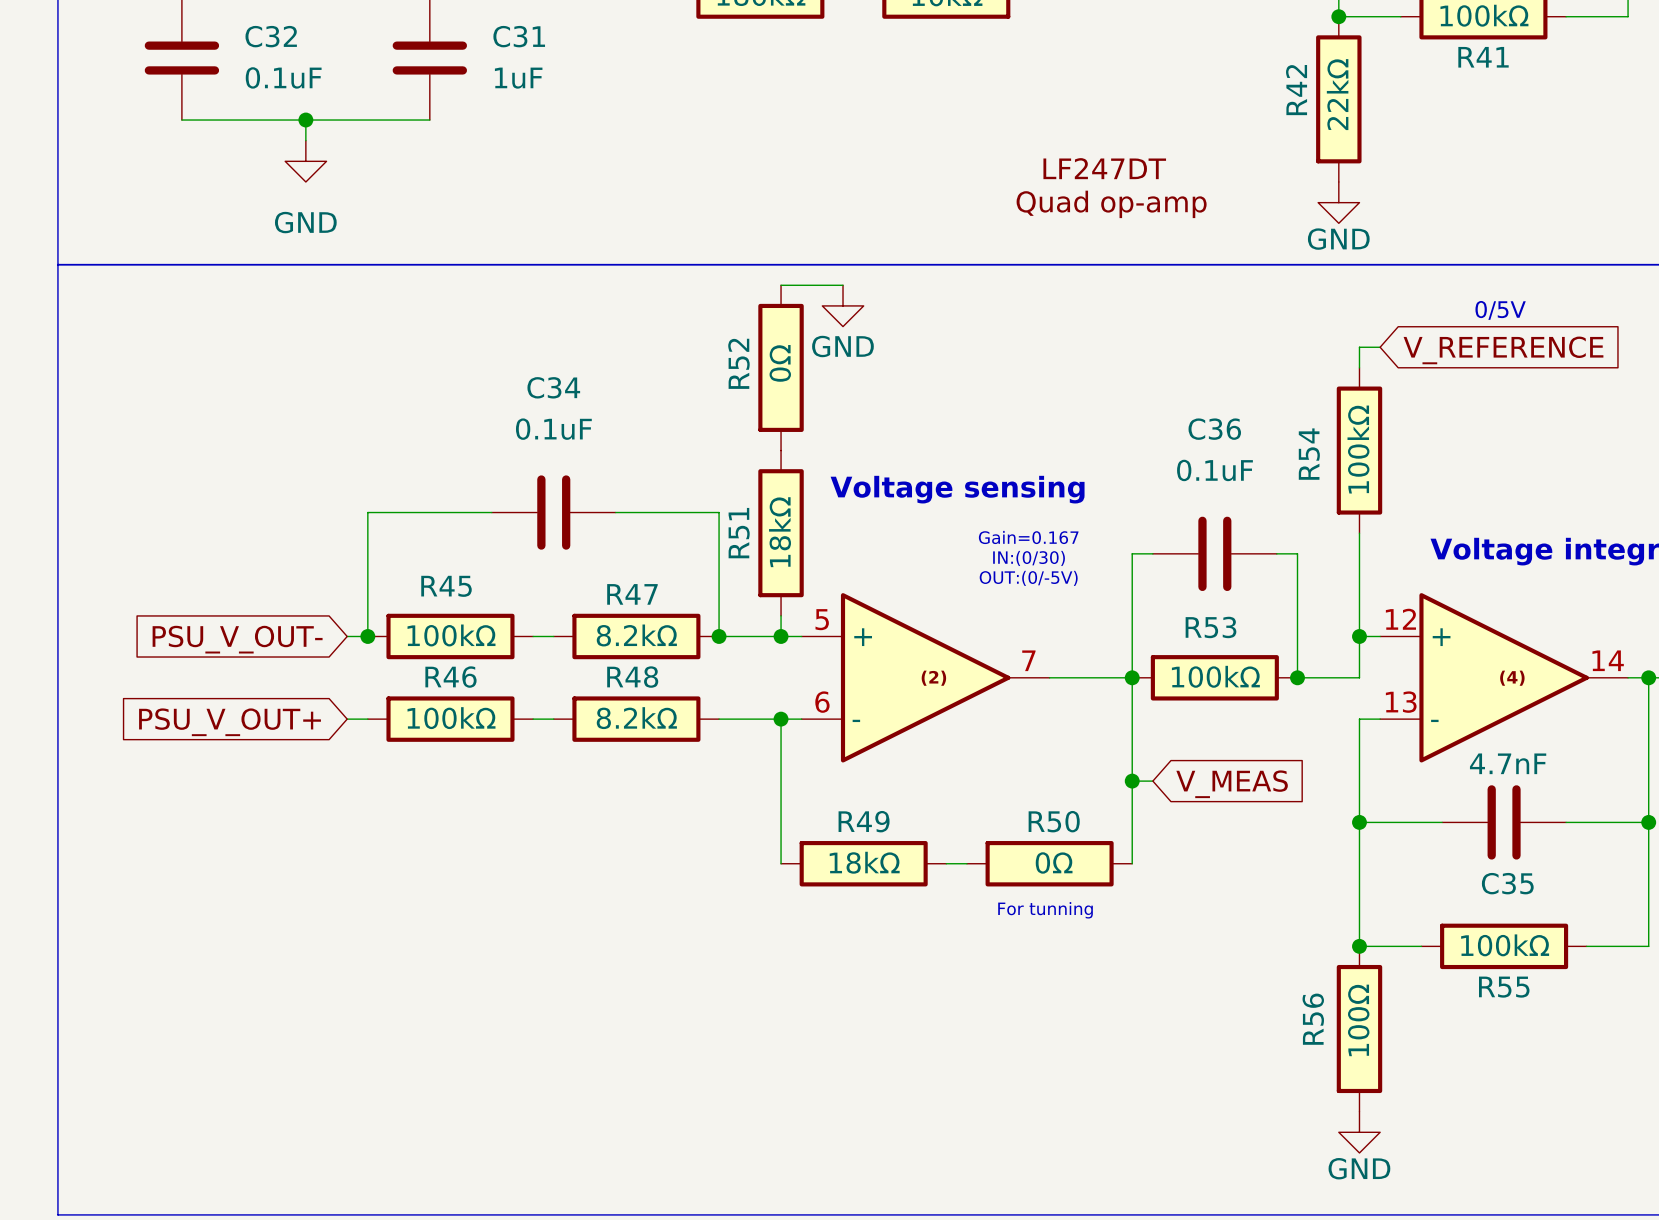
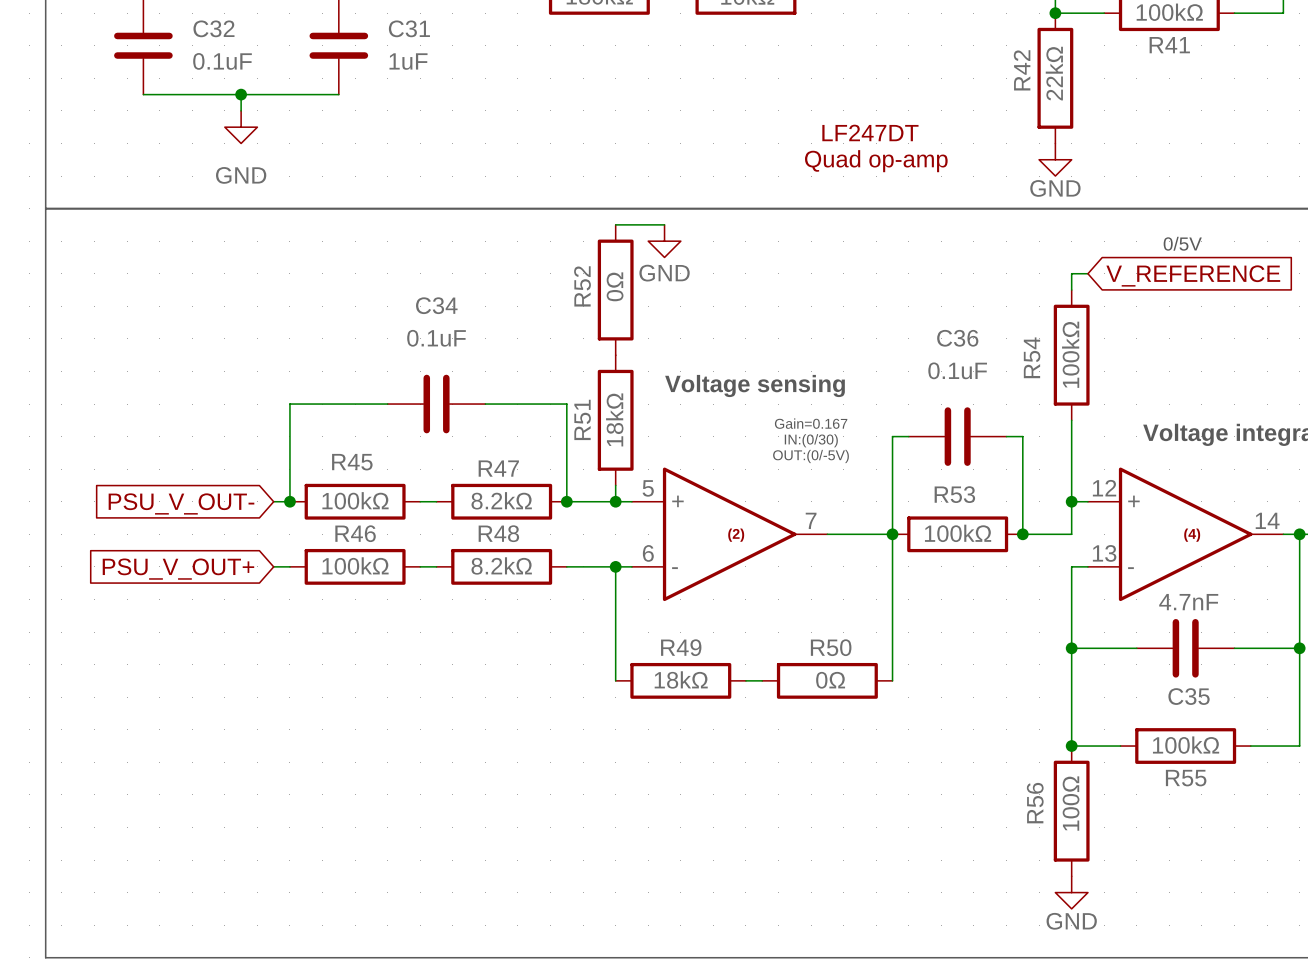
wire: (1132, 781) (1152, 781) -> none
junction: (1132, 781) -> none
global label: V_MEAS (1232, 784) -> none
text: For tunning (1045, 910) -> none

